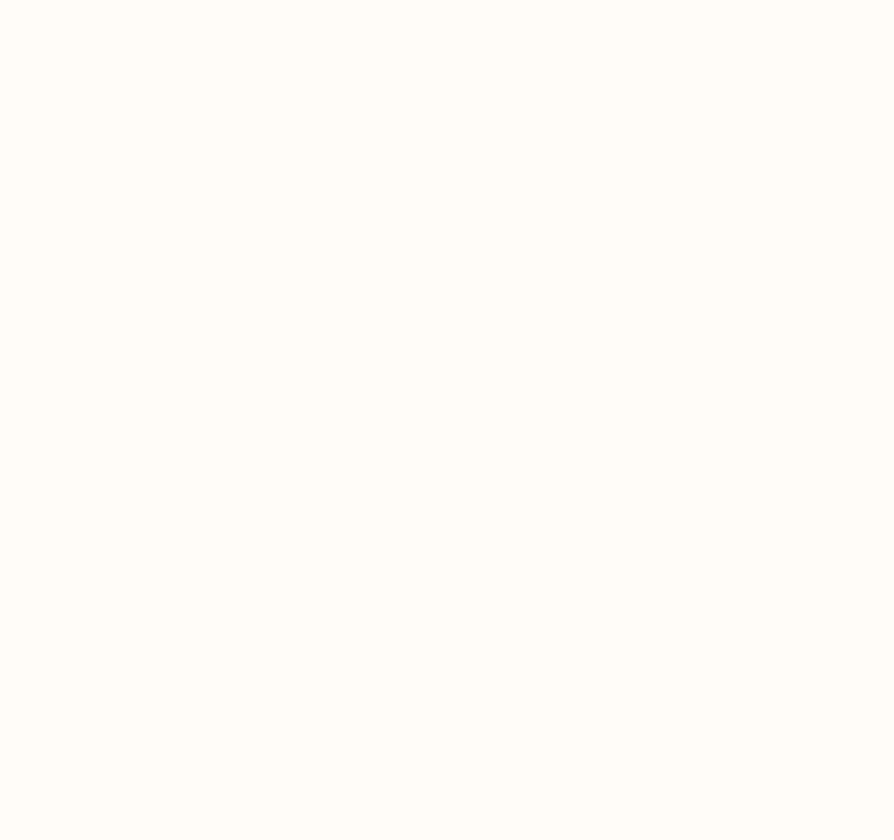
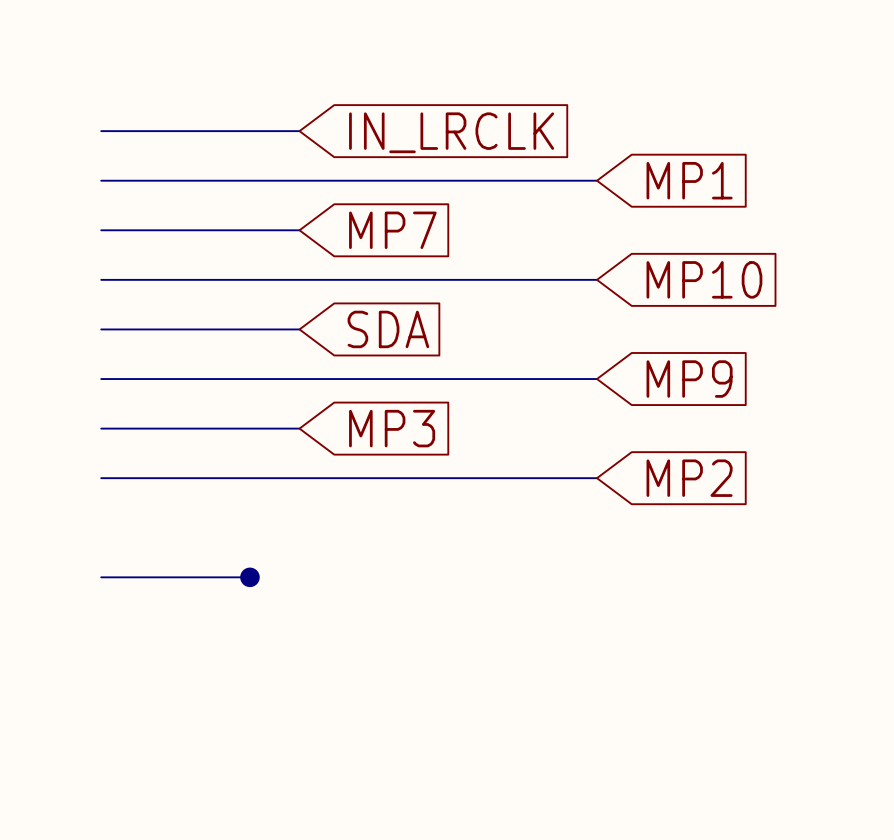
wire: none -> (101, 131) (299, 131)
global label: none -> IN_LRCLK (451, 132)
wire: none -> (101, 180) (597, 180)
global label: none -> MP1 (689, 180)
wire: none -> (101, 230) (299, 230)
global label: none -> MP7 (392, 230)
wire: none -> (101, 279) (597, 279)
global label: none -> MP10 (704, 279)
wire: none -> (101, 329) (299, 329)
global label: none -> SDA (388, 329)
wire: none -> (101, 379) (597, 379)
global label: none -> MP9 (689, 379)
wire: none -> (101, 428) (299, 428)
global label: none -> MP3 (392, 428)
wire: none -> (101, 478) (597, 478)
global label: none -> MP2 (689, 478)
wire: none -> (101, 577) (249, 577)
junction: none -> (249, 577)

